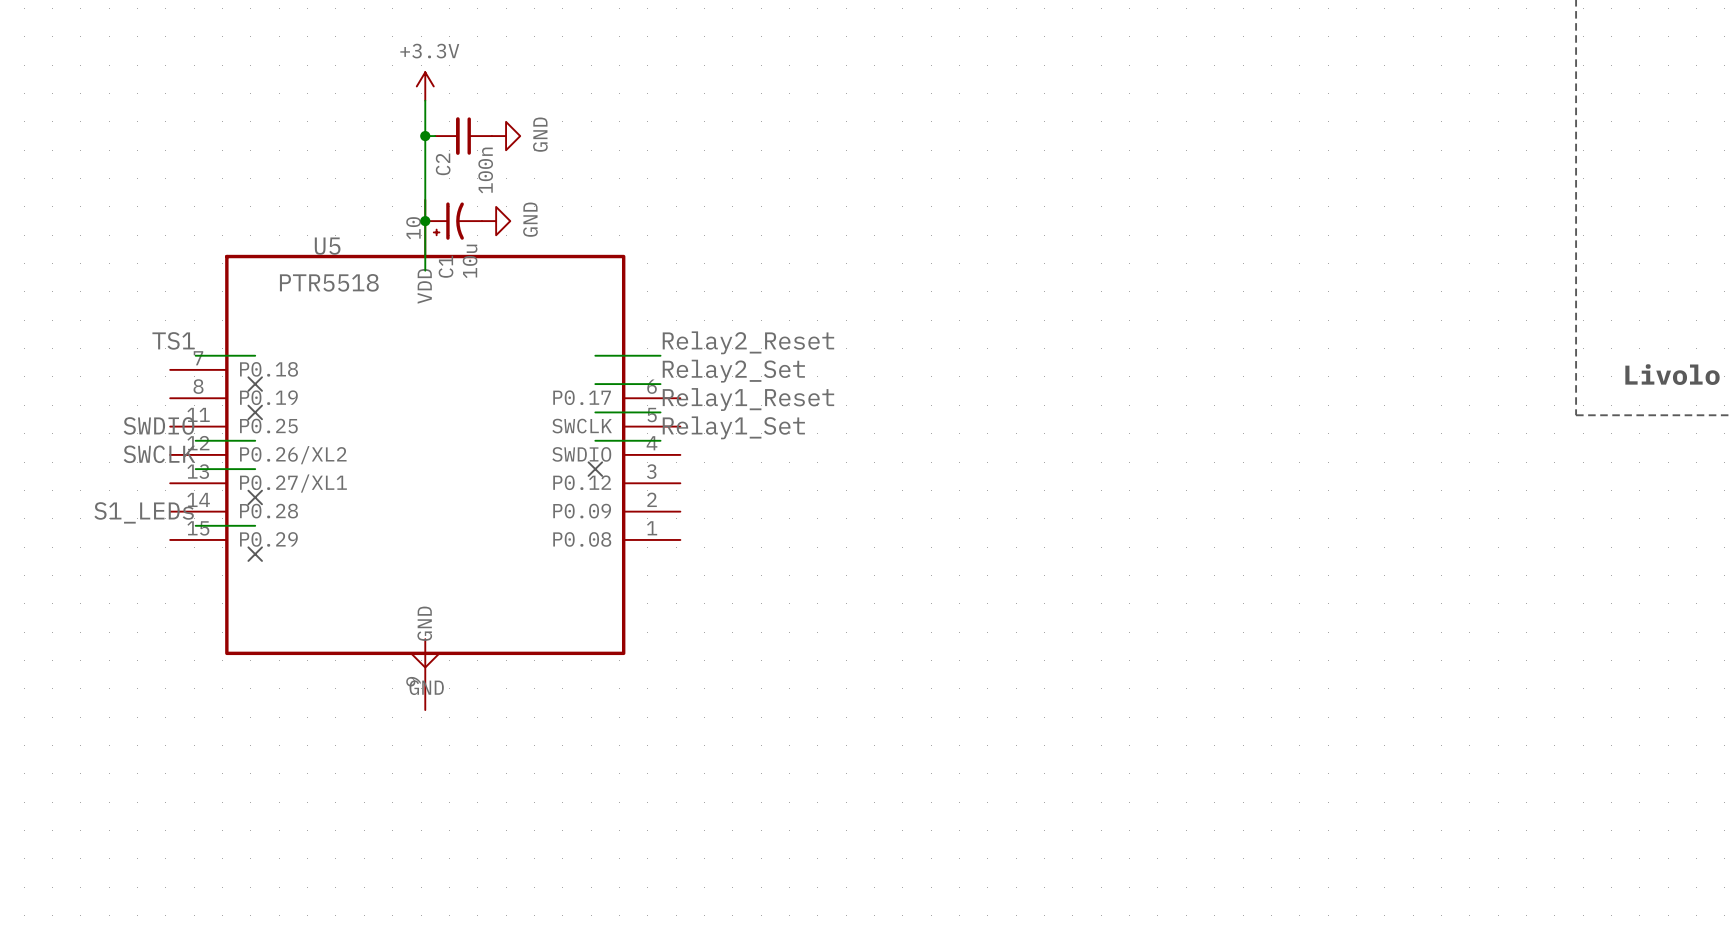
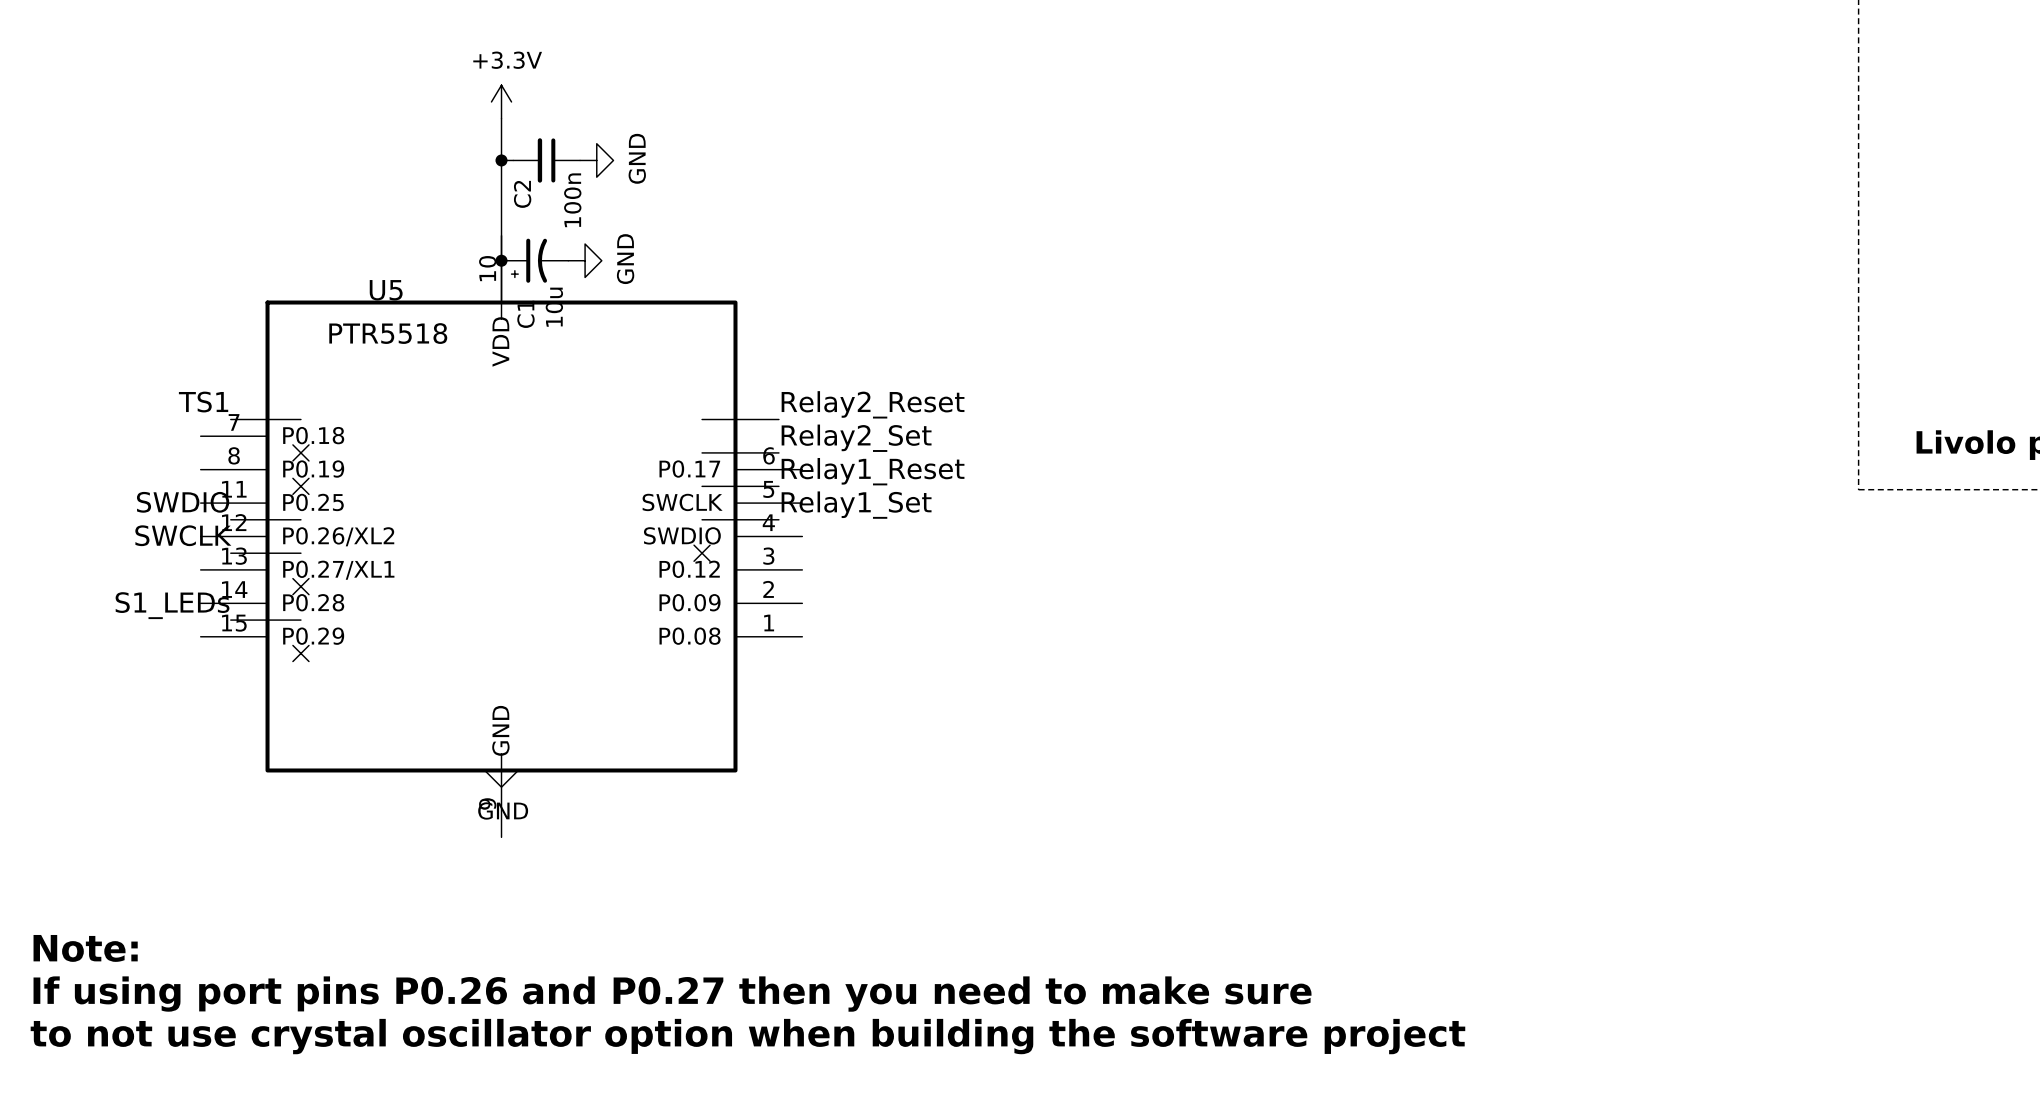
text: none -> Note: (85, 948)
text: none -> If using port pins P0.26 and P0.27 then you need to make sure (672, 994)
text: none -> to not use crystal oscillator option when building the software project (747, 1036)

